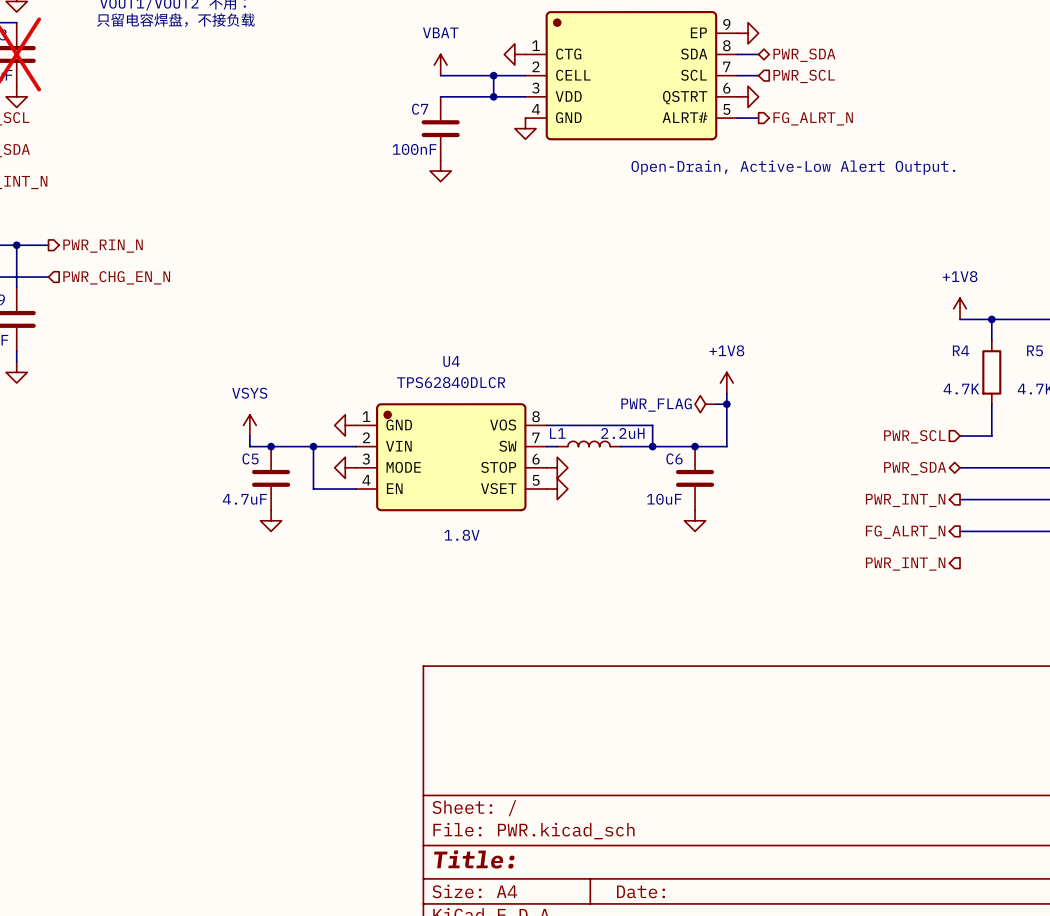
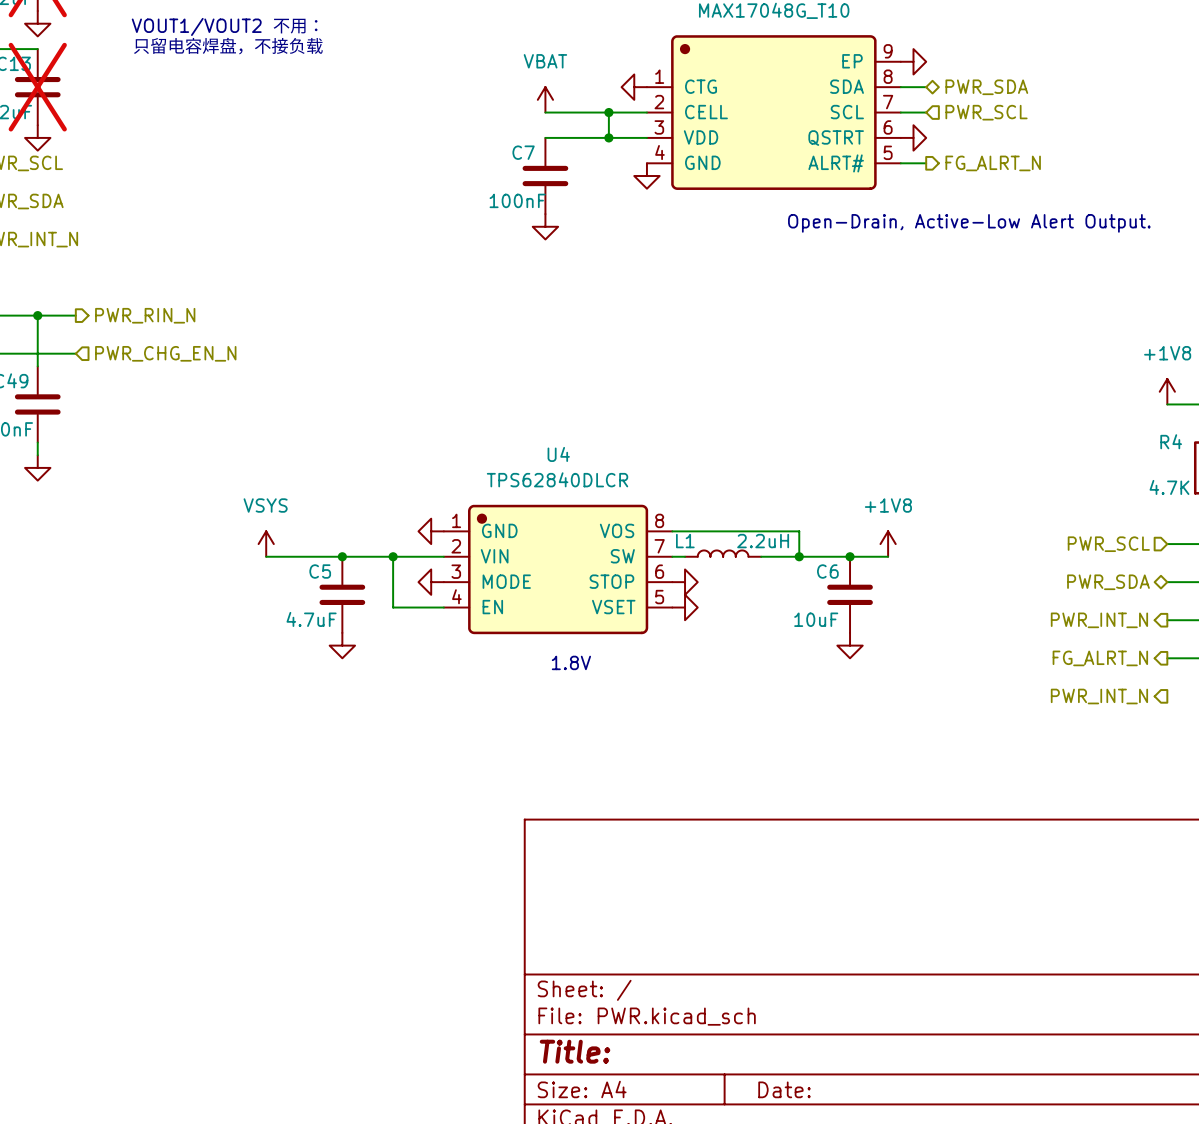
power symbol position: +1V8 (726, 383) -> +1V8 (888, 544)
wire: (726, 393) (726, 446) -> none
power symbol: PWR_FLAG (705, 404) -> none
wire: (716, 404) (726, 404) -> none
junction: (726, 404) -> none
power symbol position: VSYS (249, 425) -> VSYS (266, 544)
wire: (249, 436) (249, 446) -> (266, 556) (316, 556)

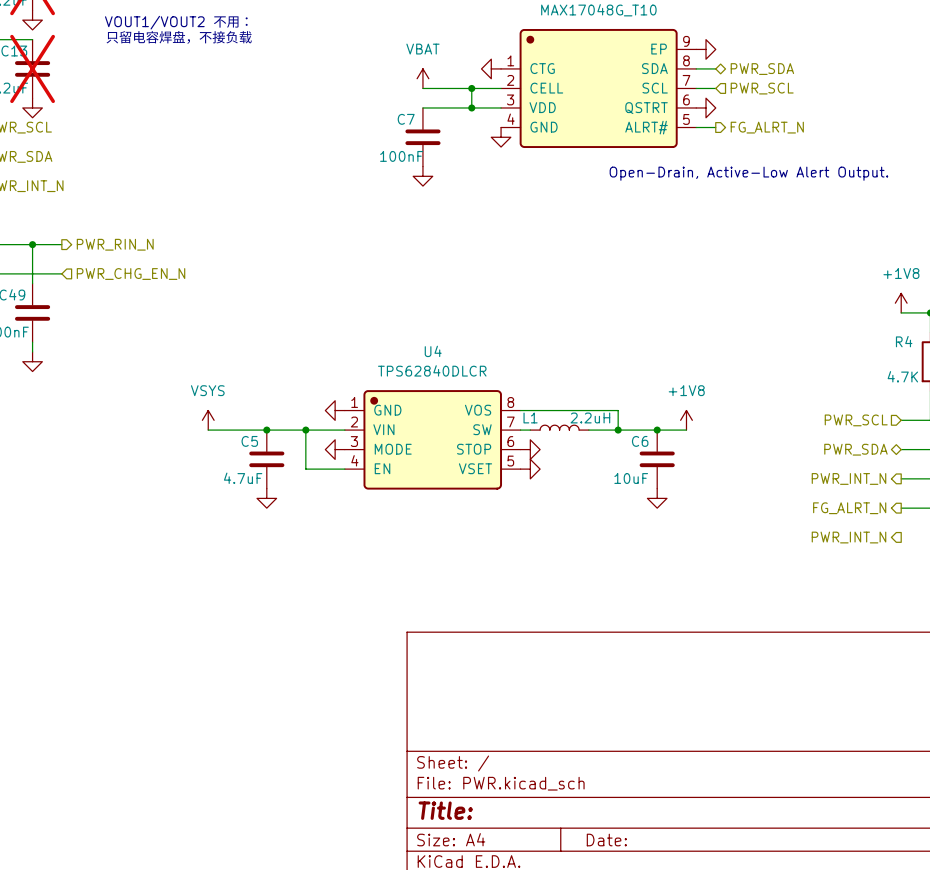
text: 1.8V (571, 662) -> none

